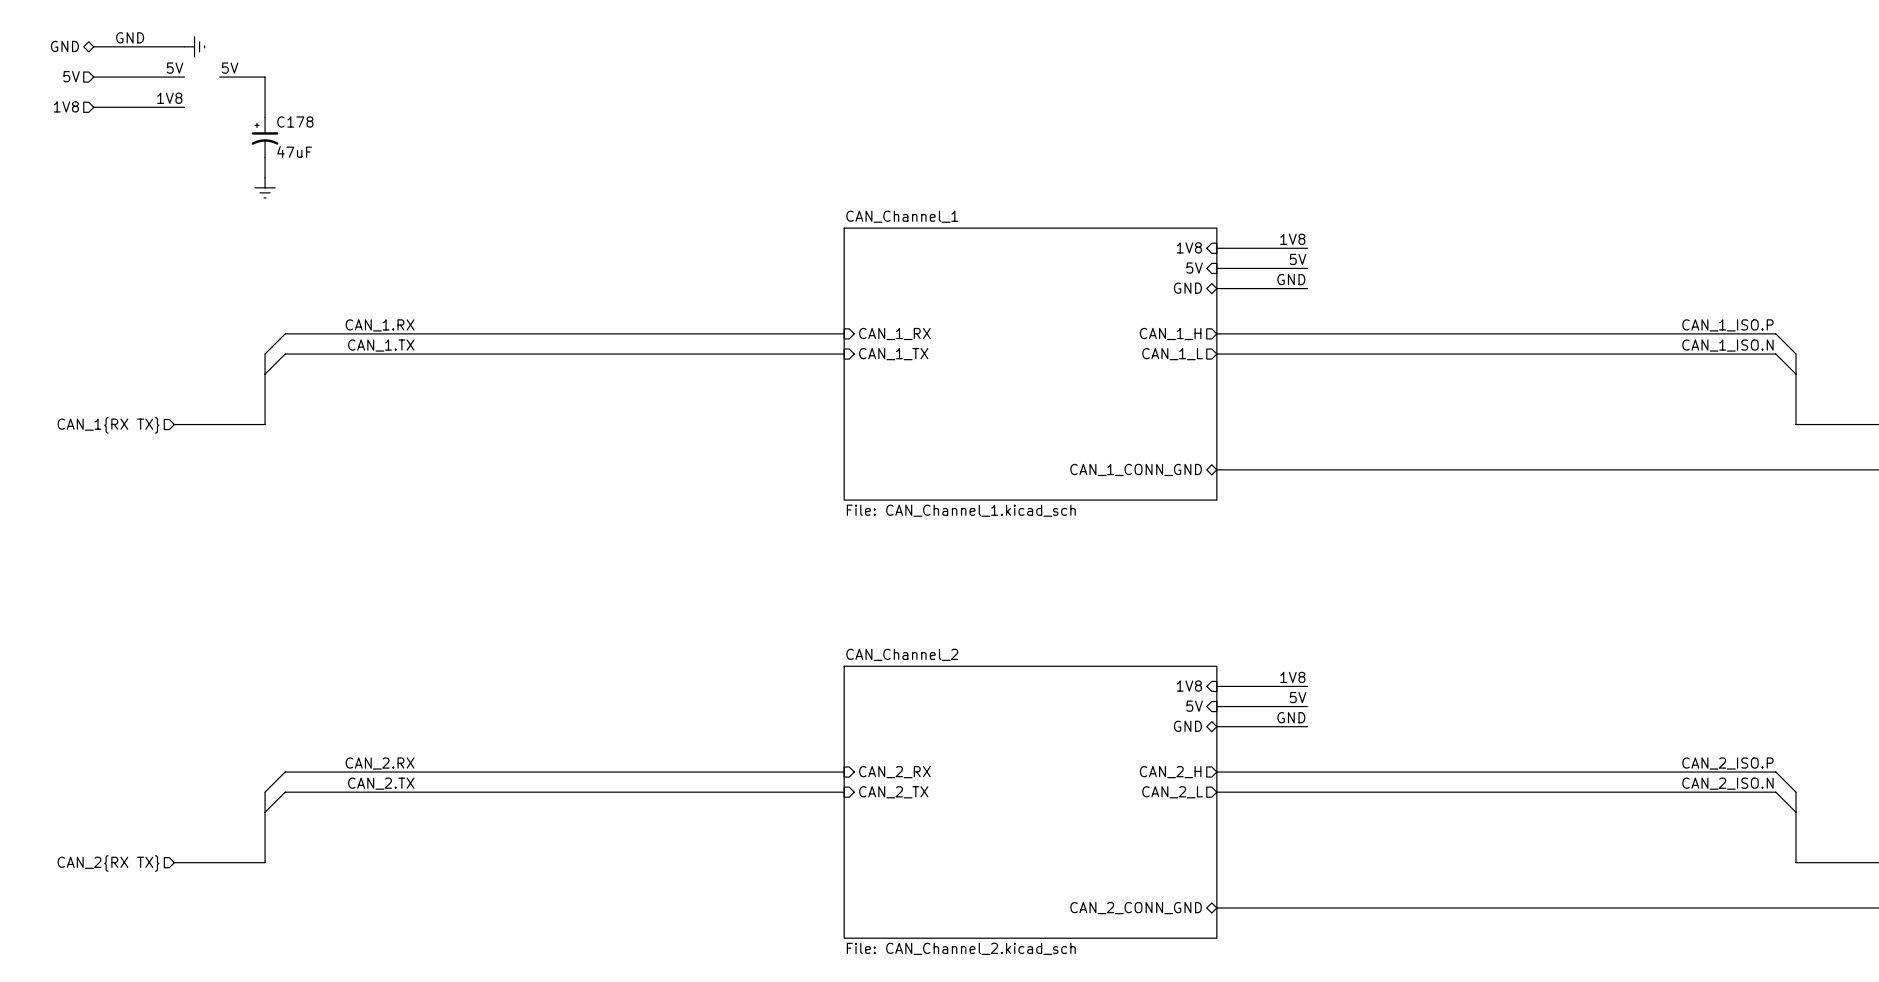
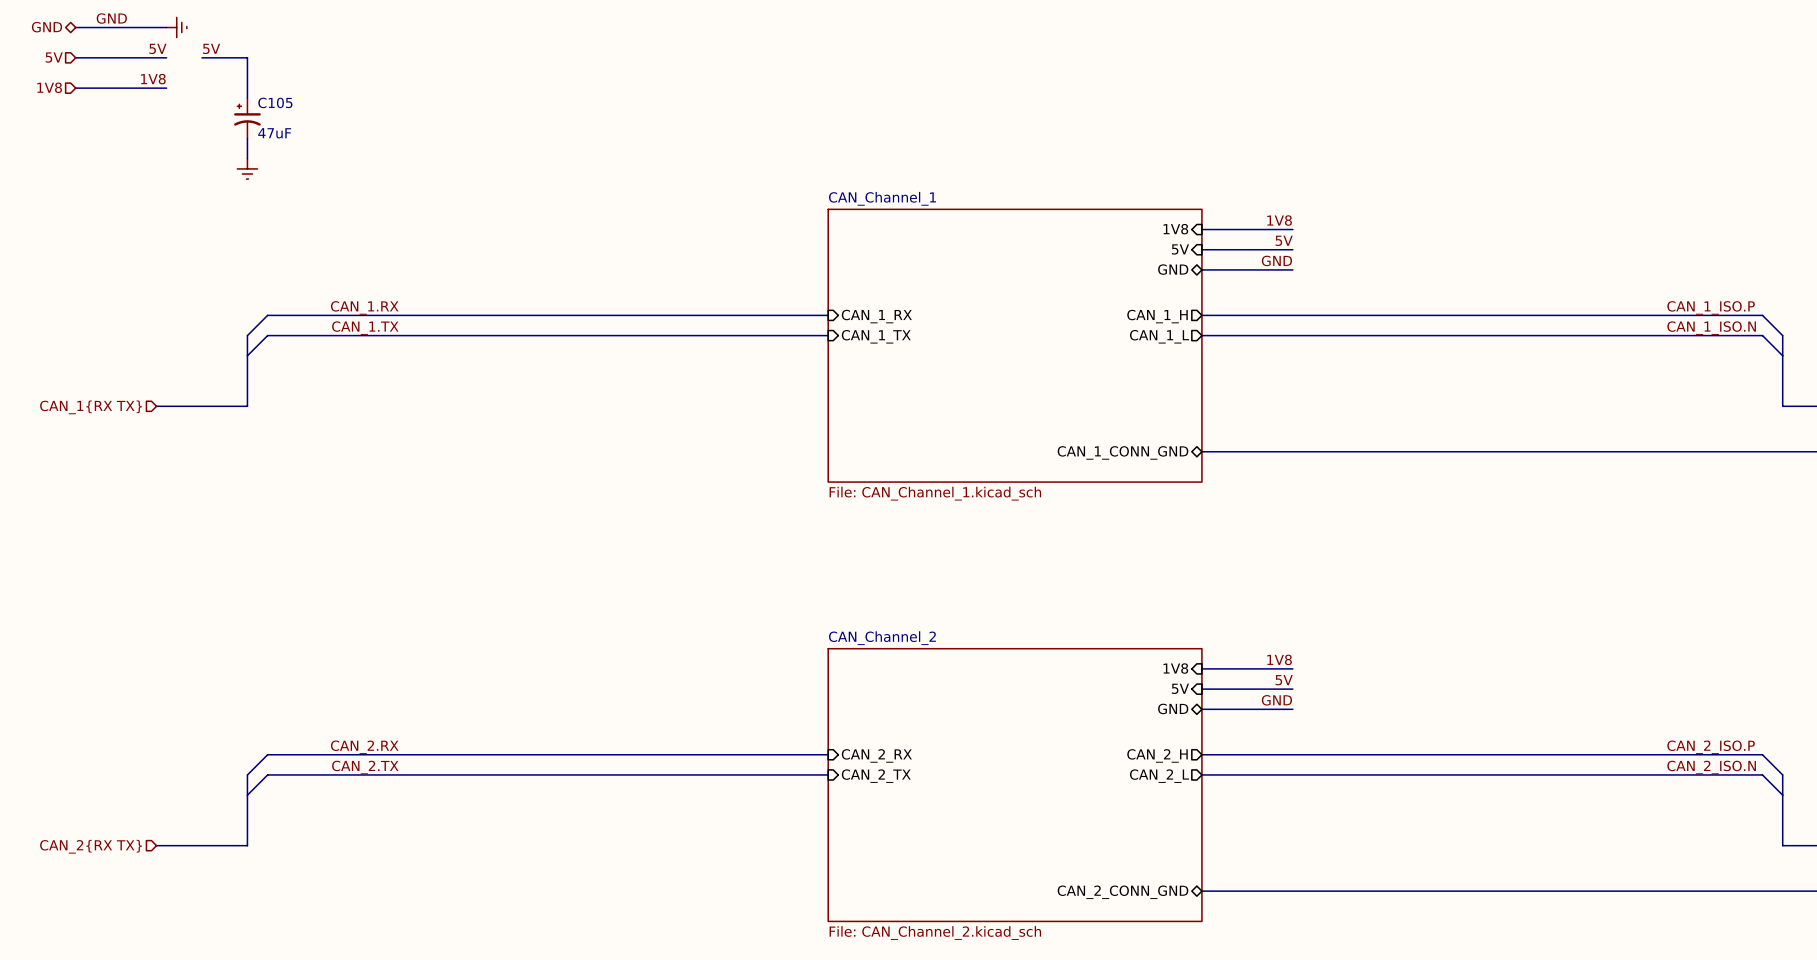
C178 name: C178 (295, 122) -> C105 (275, 102)

